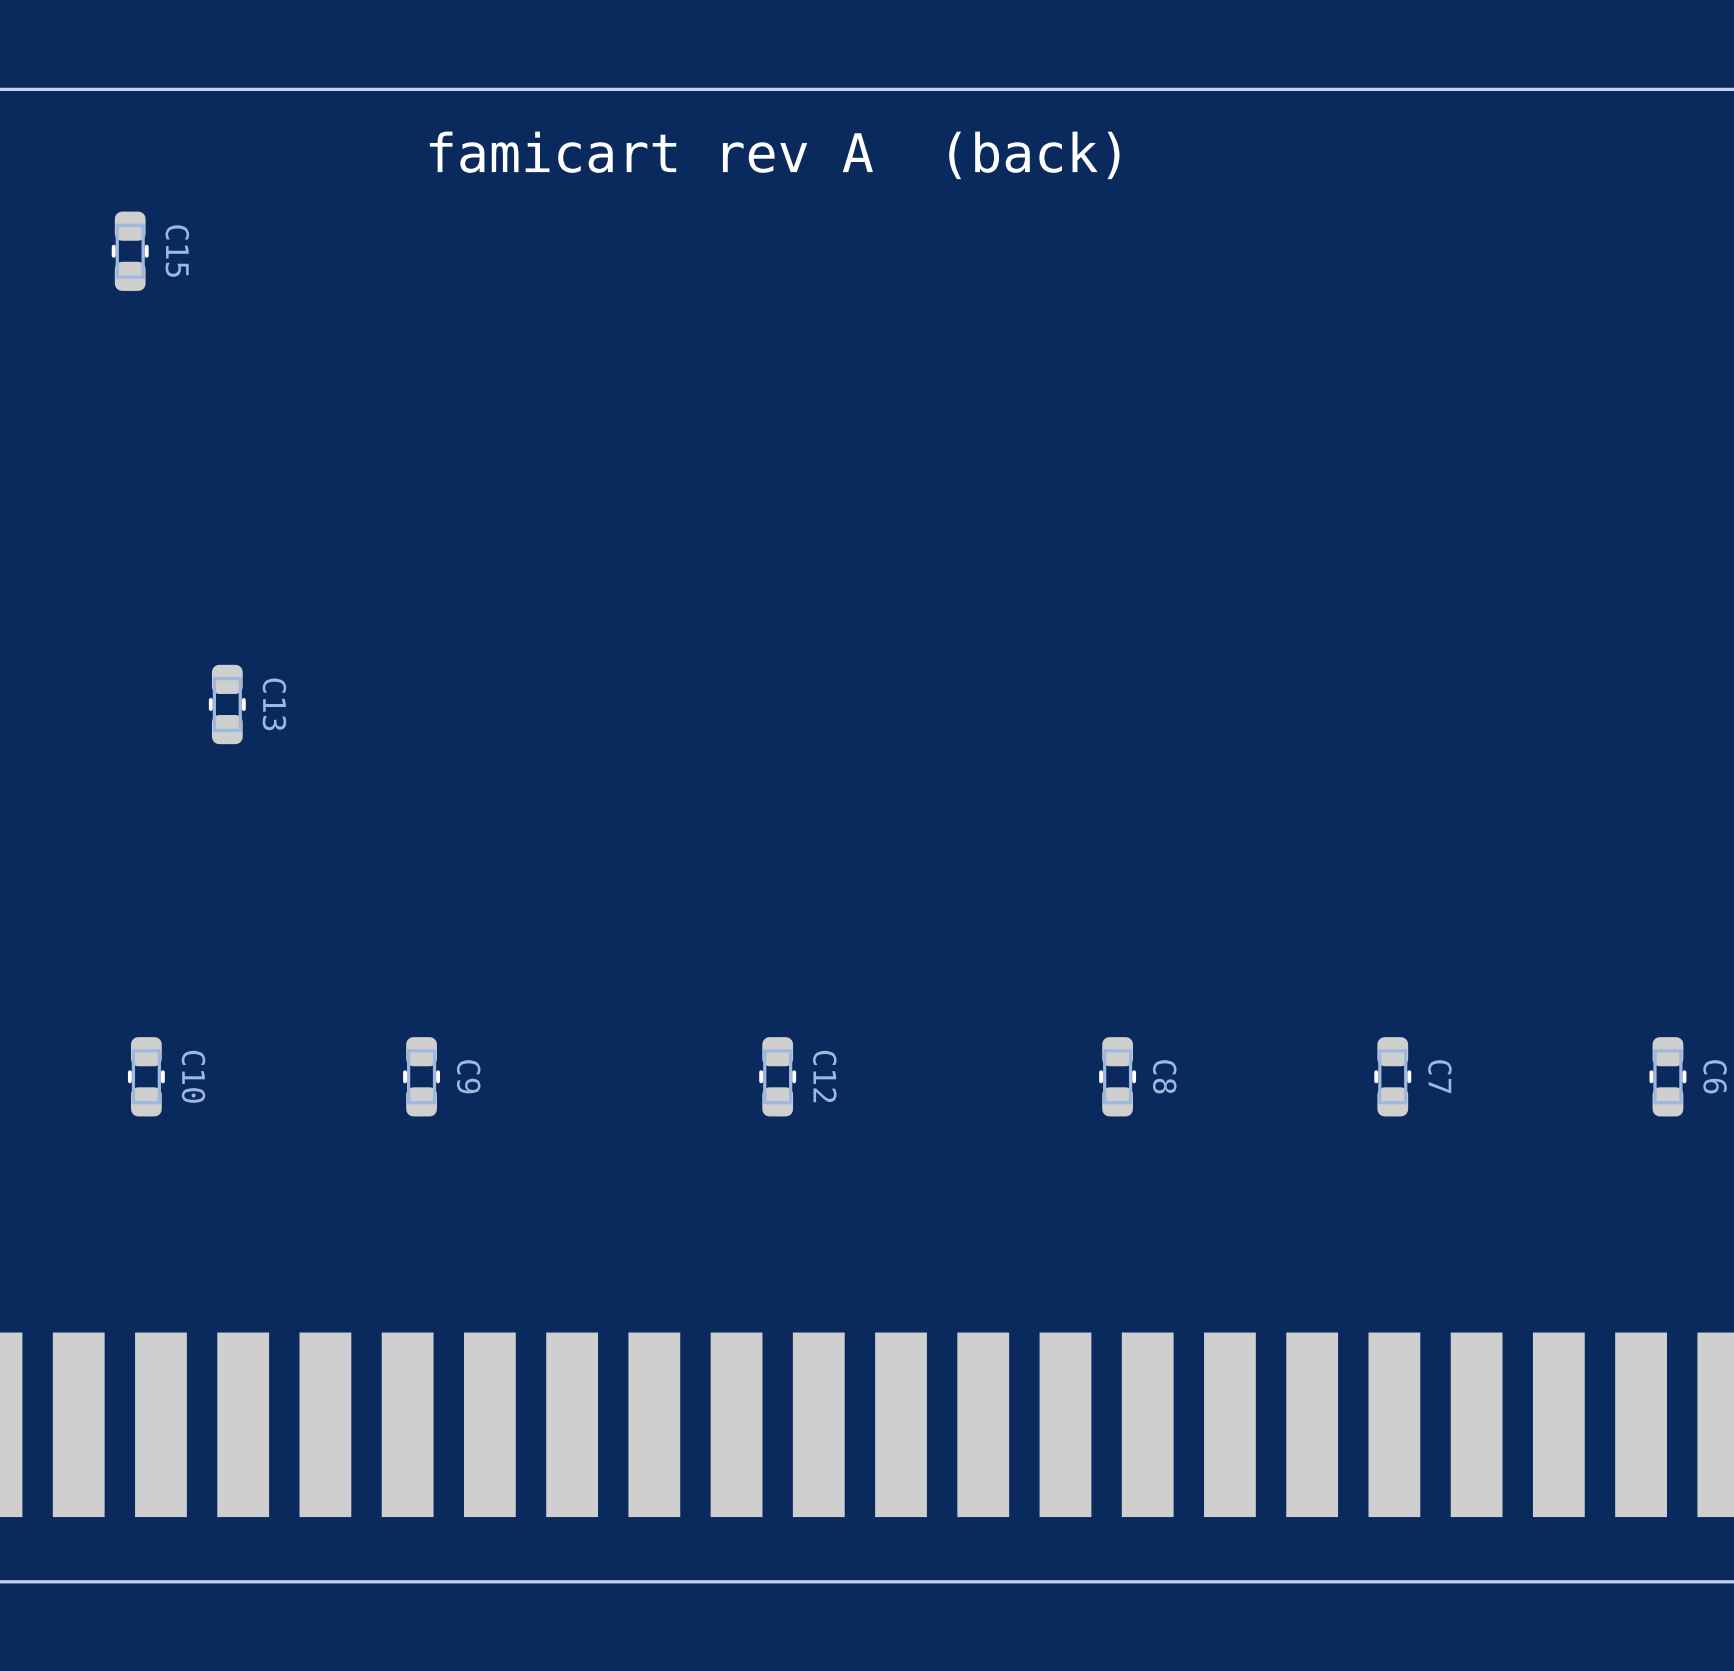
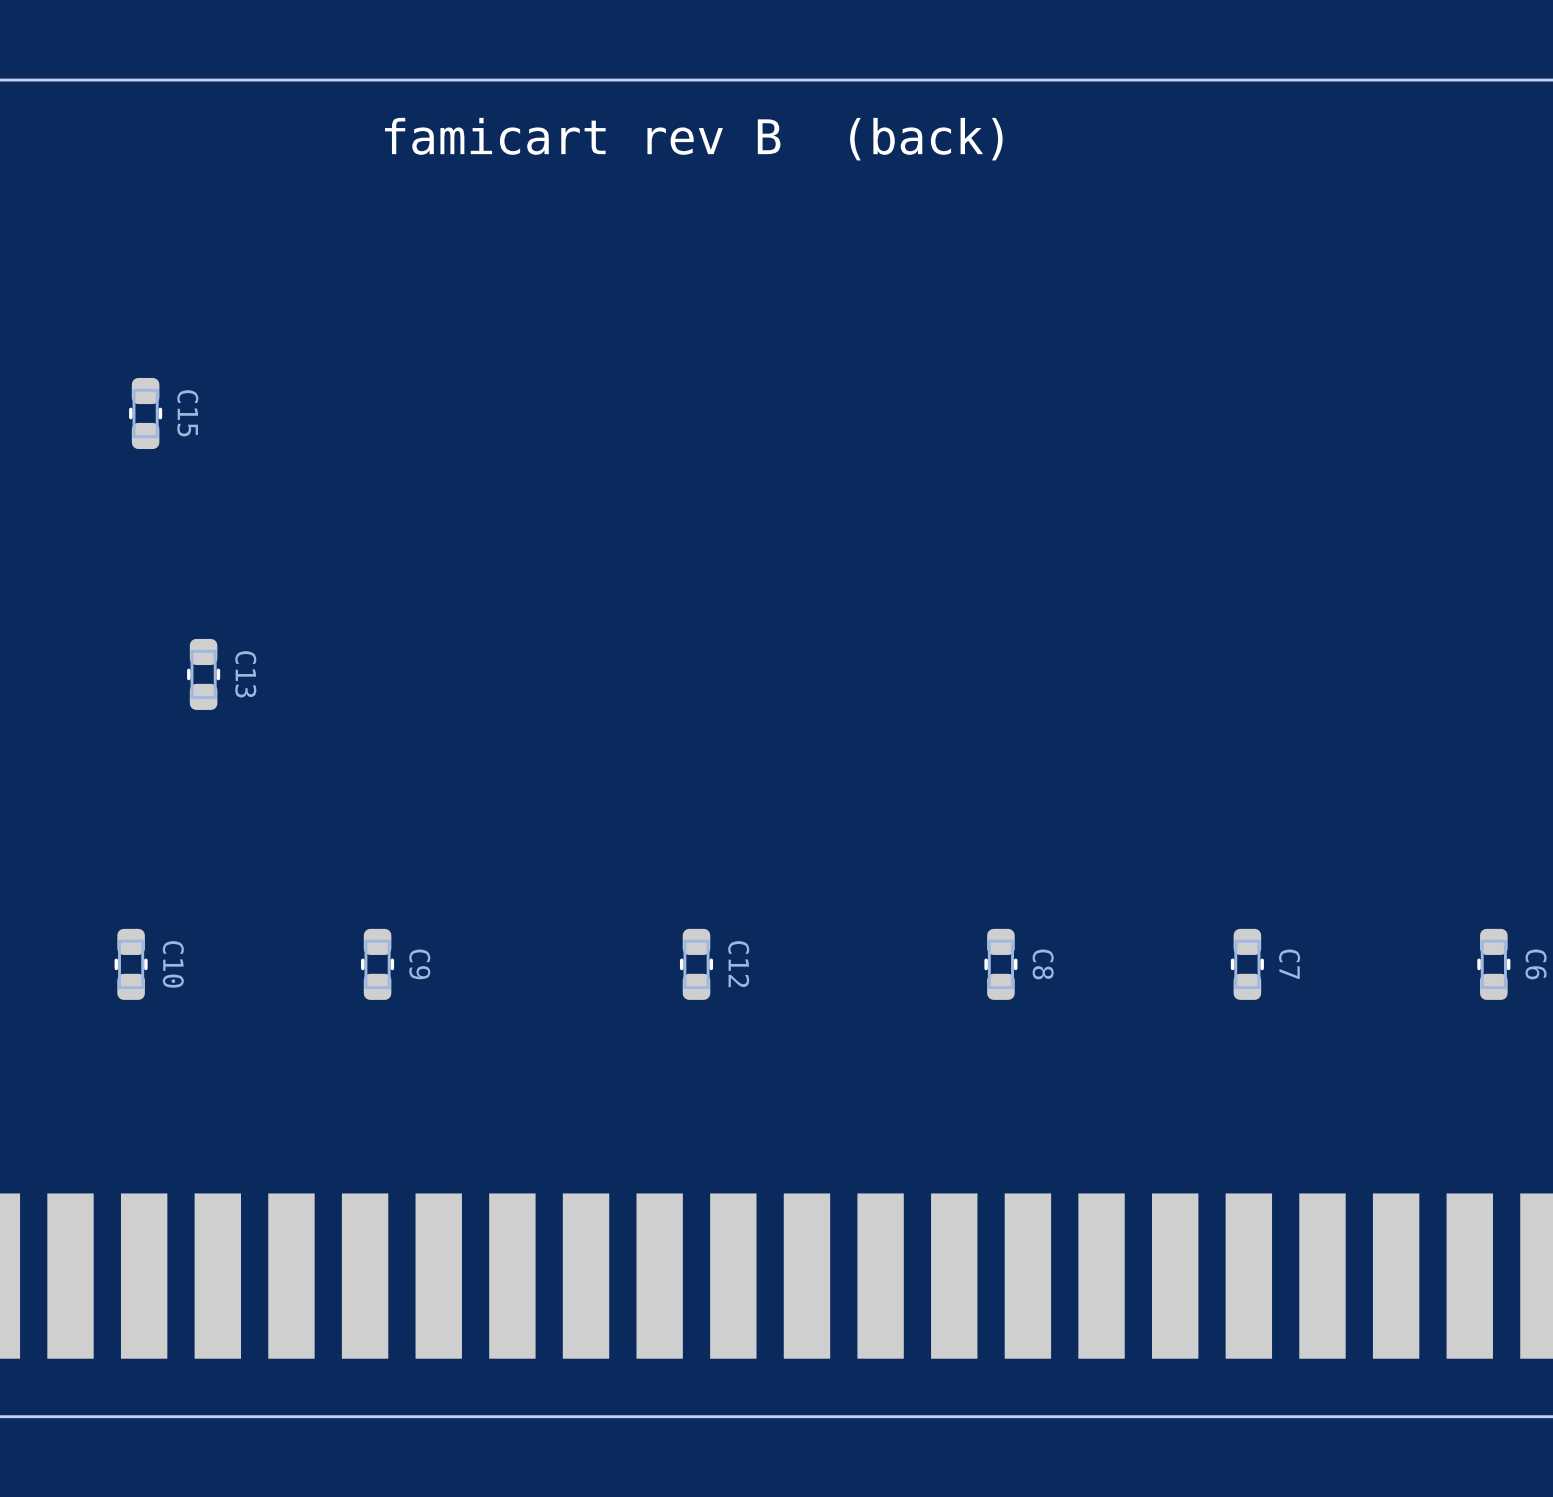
text: famicart rev A (back) (774, 155) -> famicart rev B (back) (693, 139)
C15 position: (130, 251) -> (145, 413)
C13 position: (227, 704) -> (203, 674)

